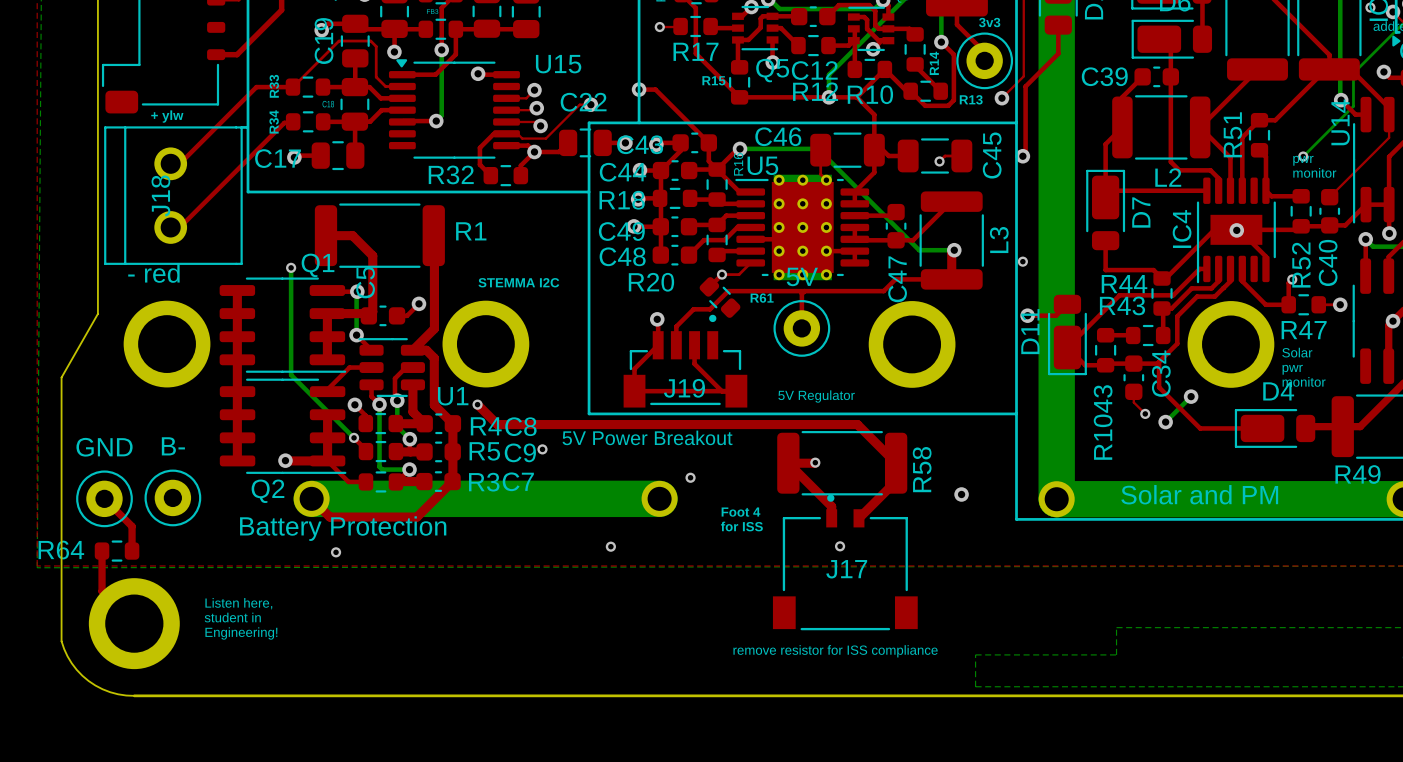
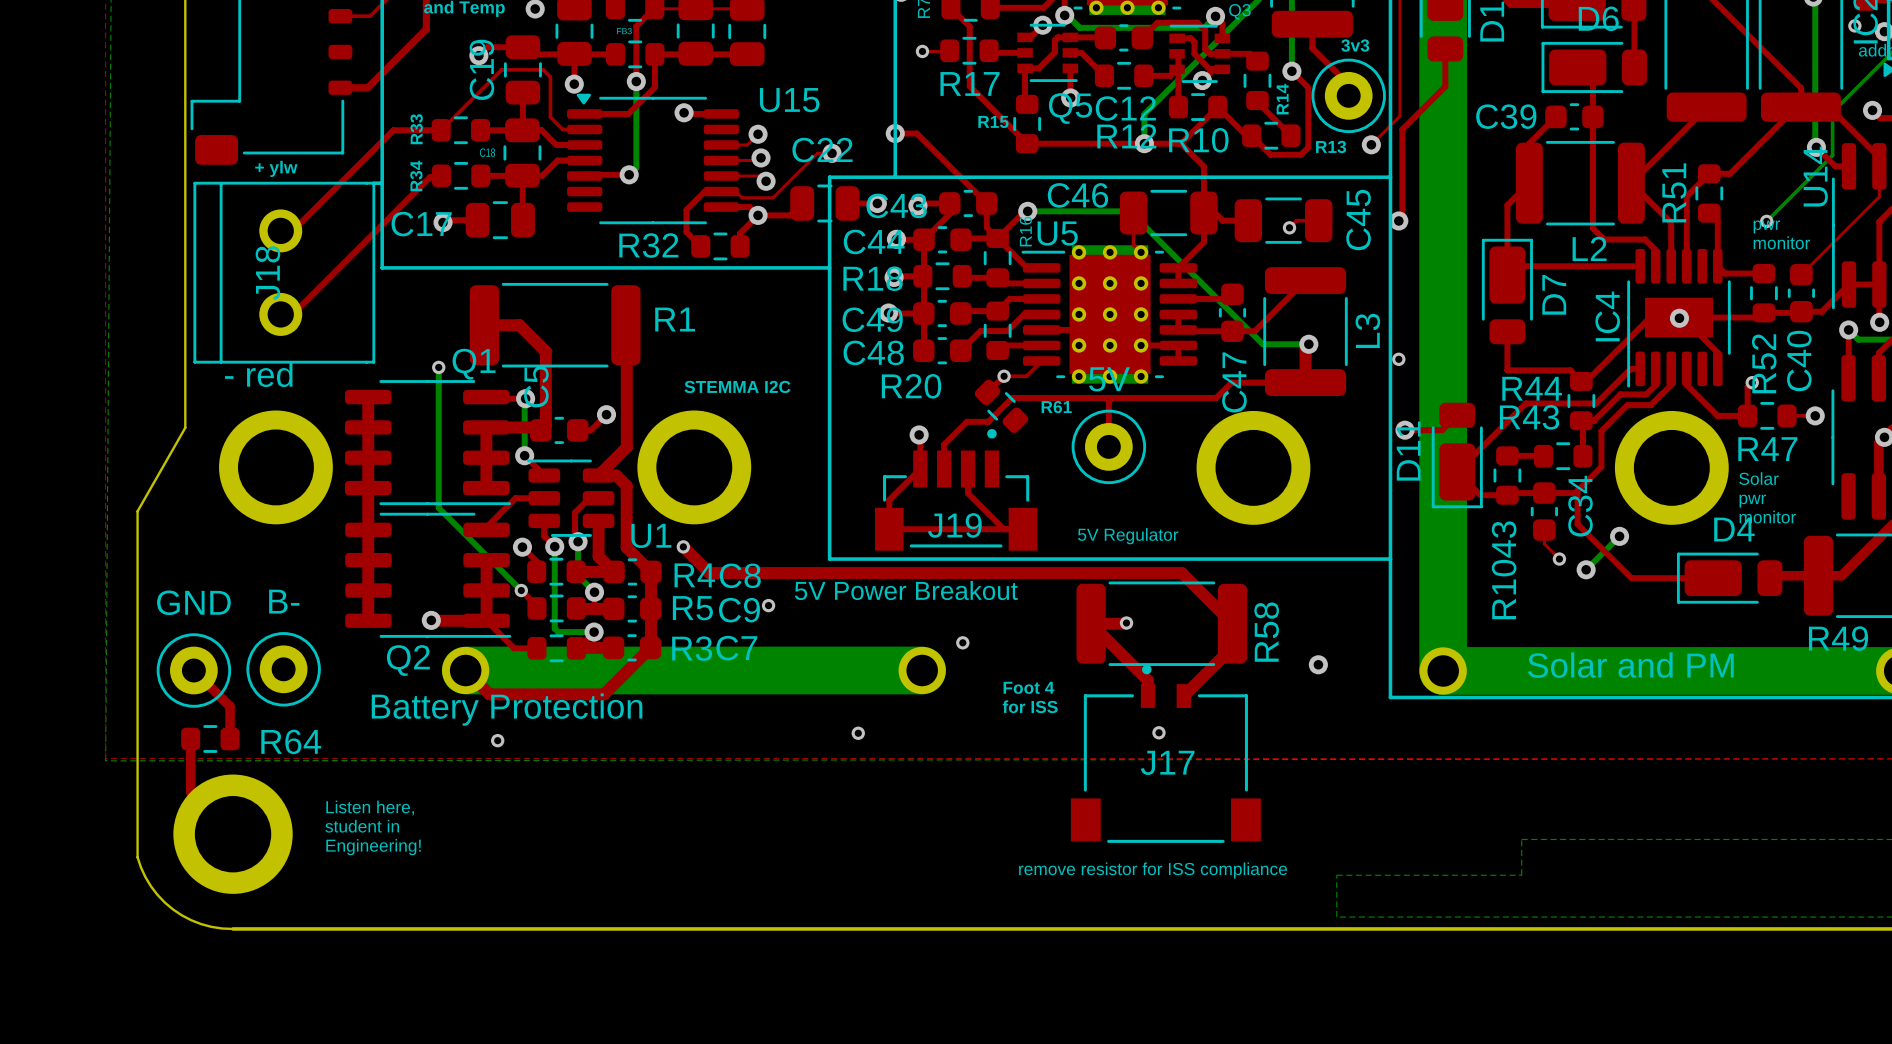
R64 name position: R64 (61, 550) -> R64 (291, 741)

